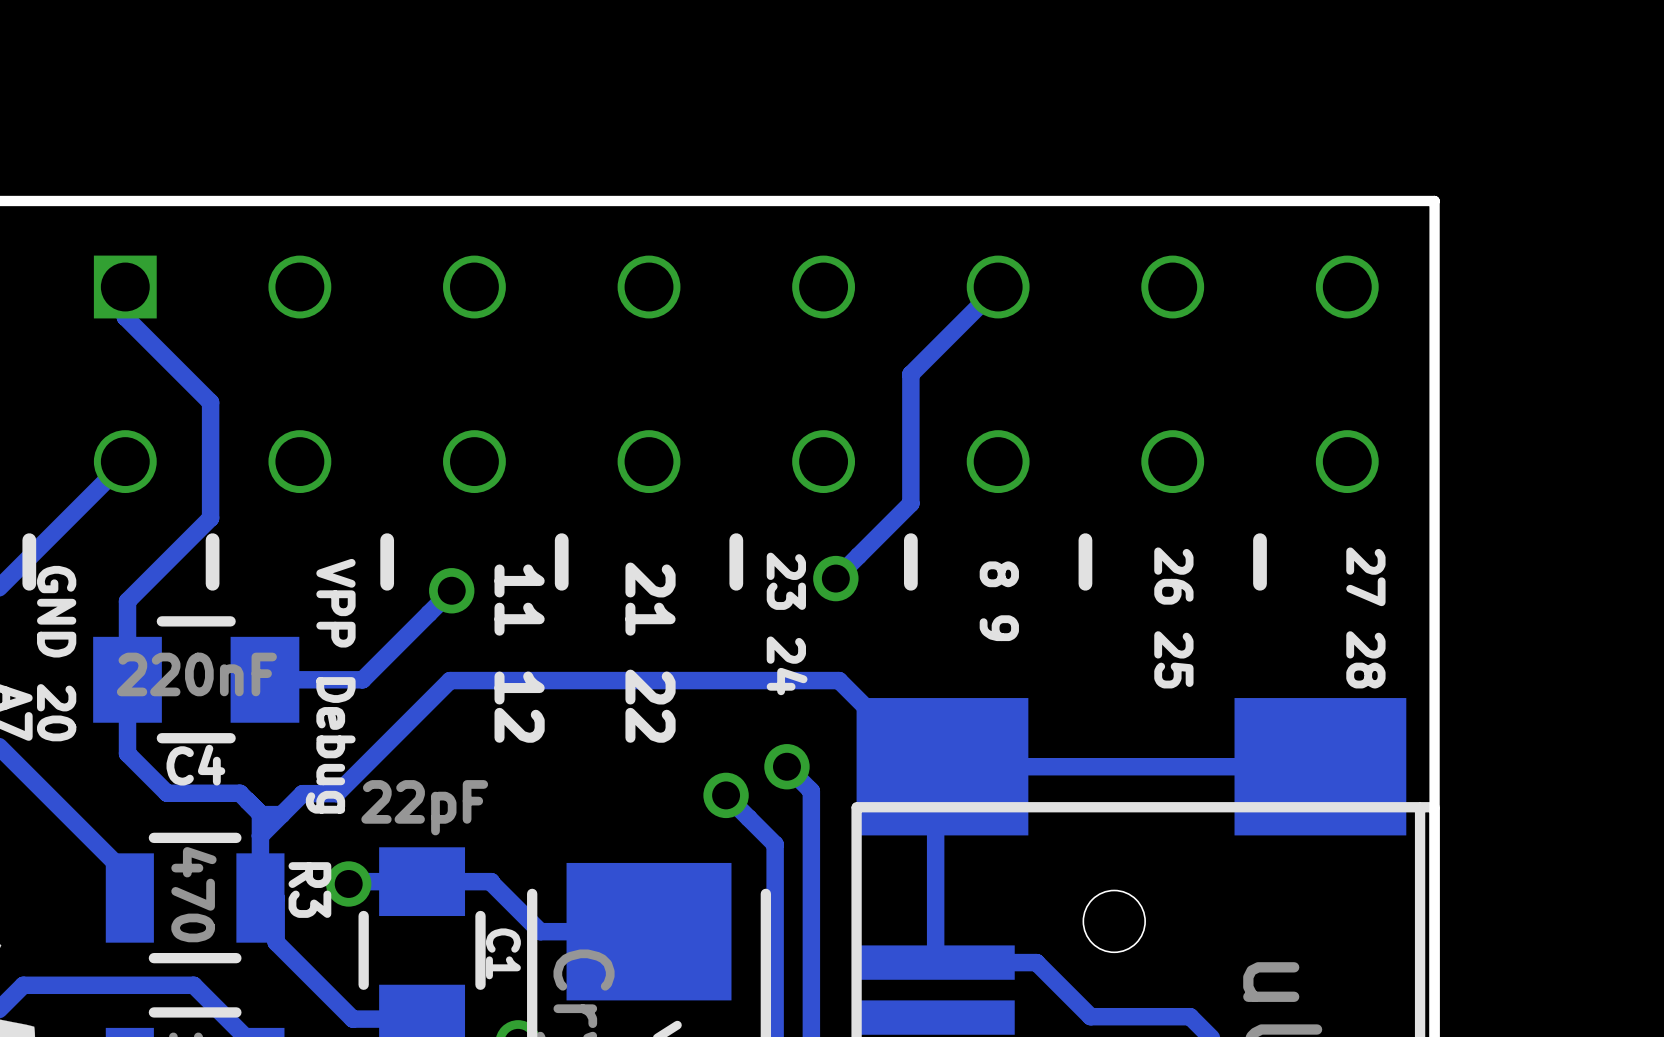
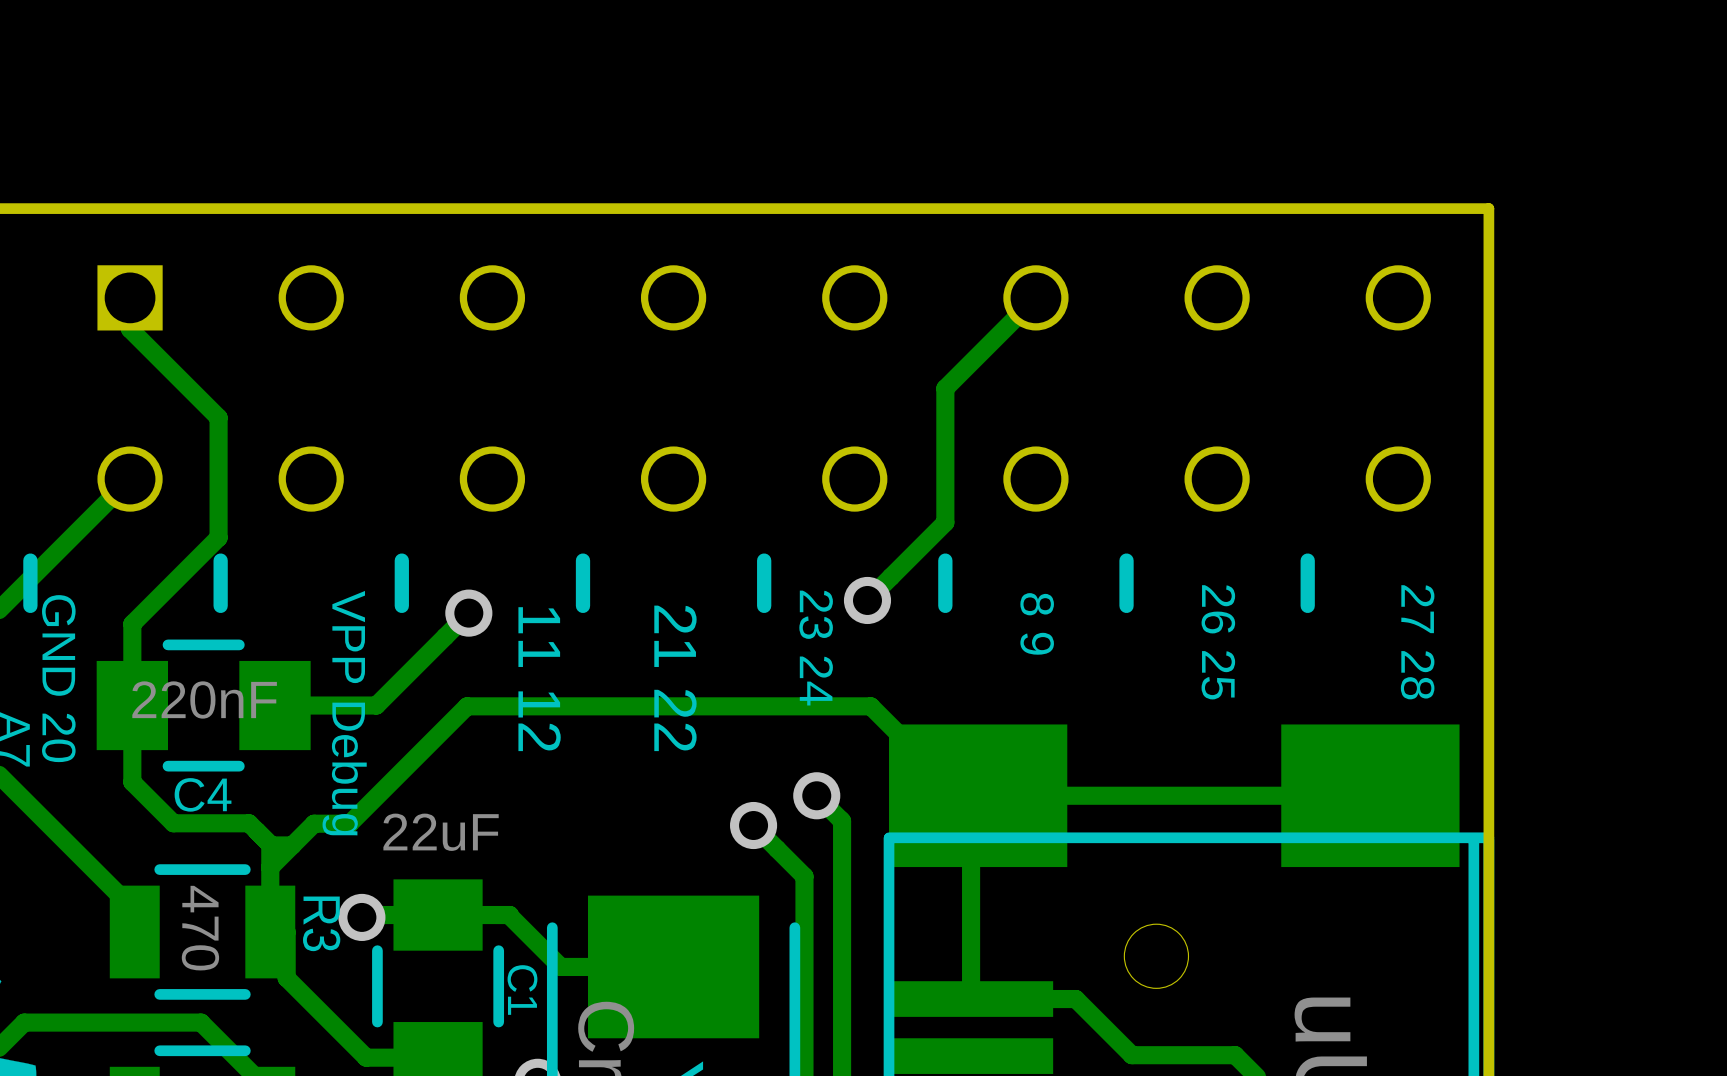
C1 value: 22pF (424, 807) -> 22uF (441, 832)

